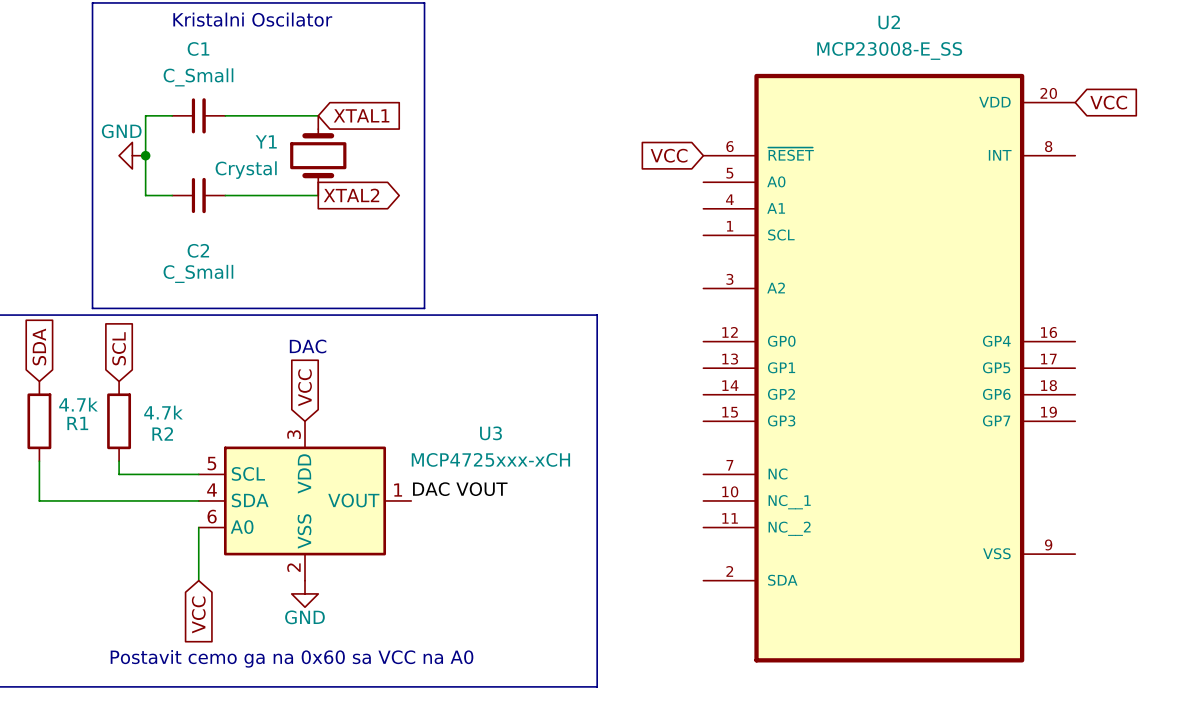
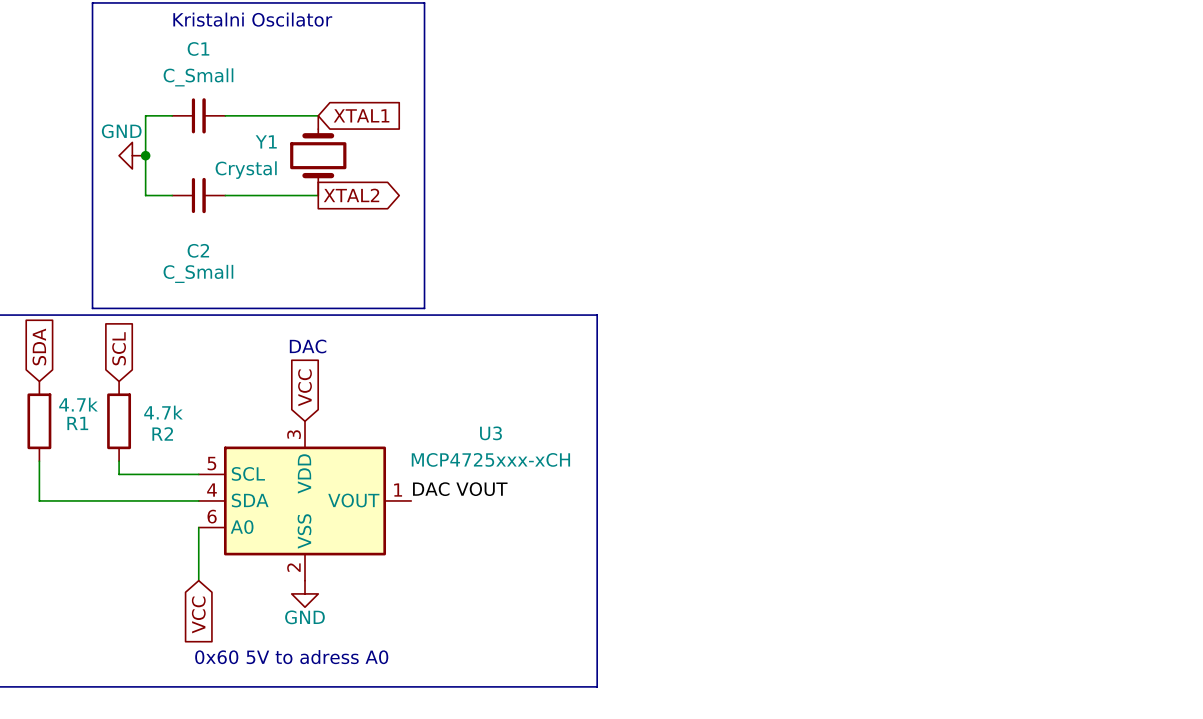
global label: VCC (1108, 102) -> none
global label: VCC (669, 155) -> none
U2: MCP23008-E_SS (889, 368) -> none
text: Postavit cemo ga na 0x60 sa VCC na A0 (292, 658) -> 0x60 5V to adress A0 (291, 657)

